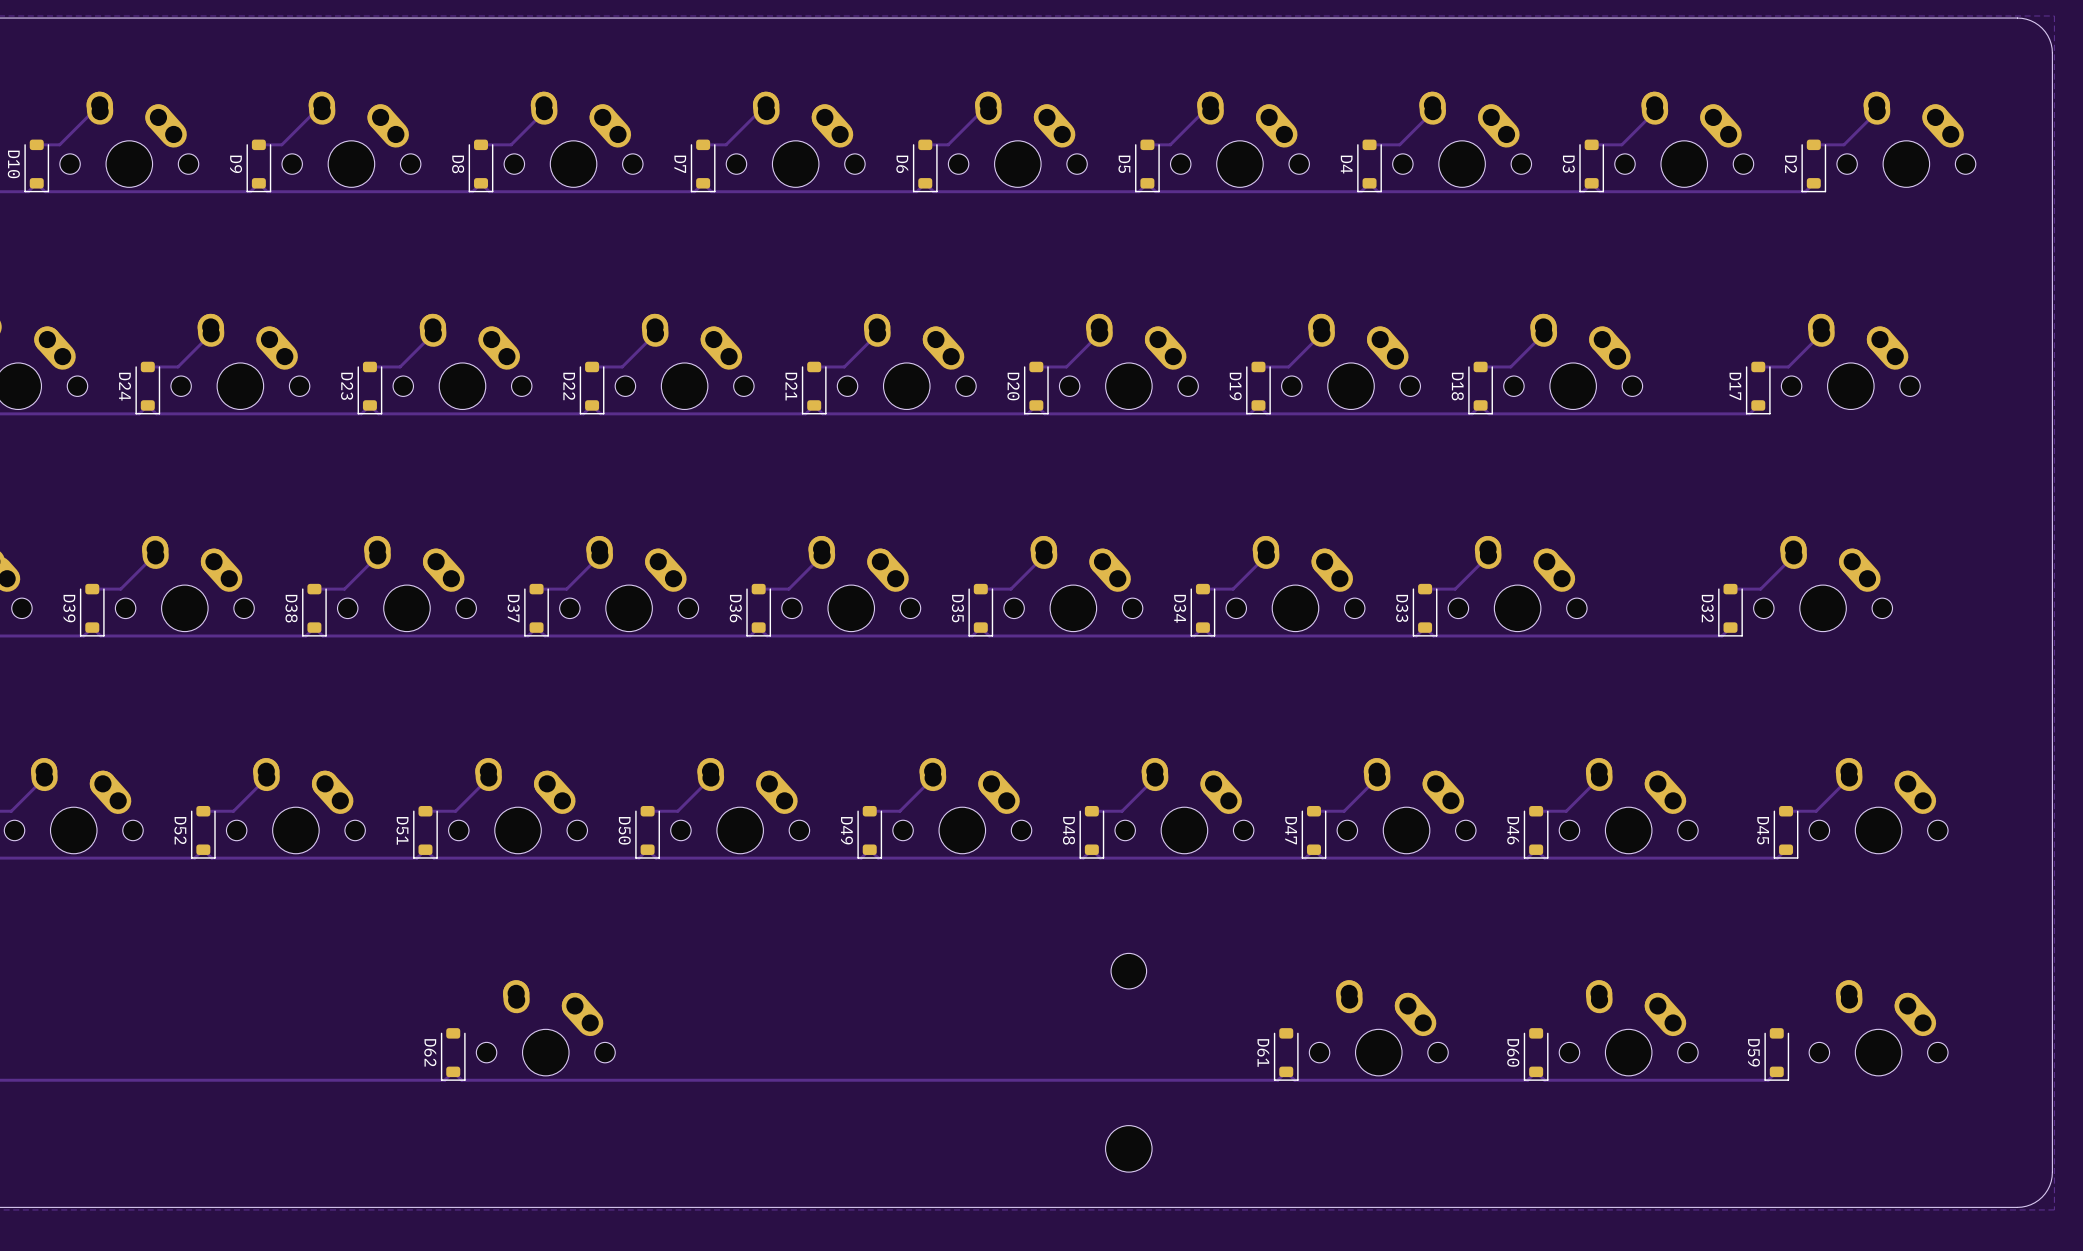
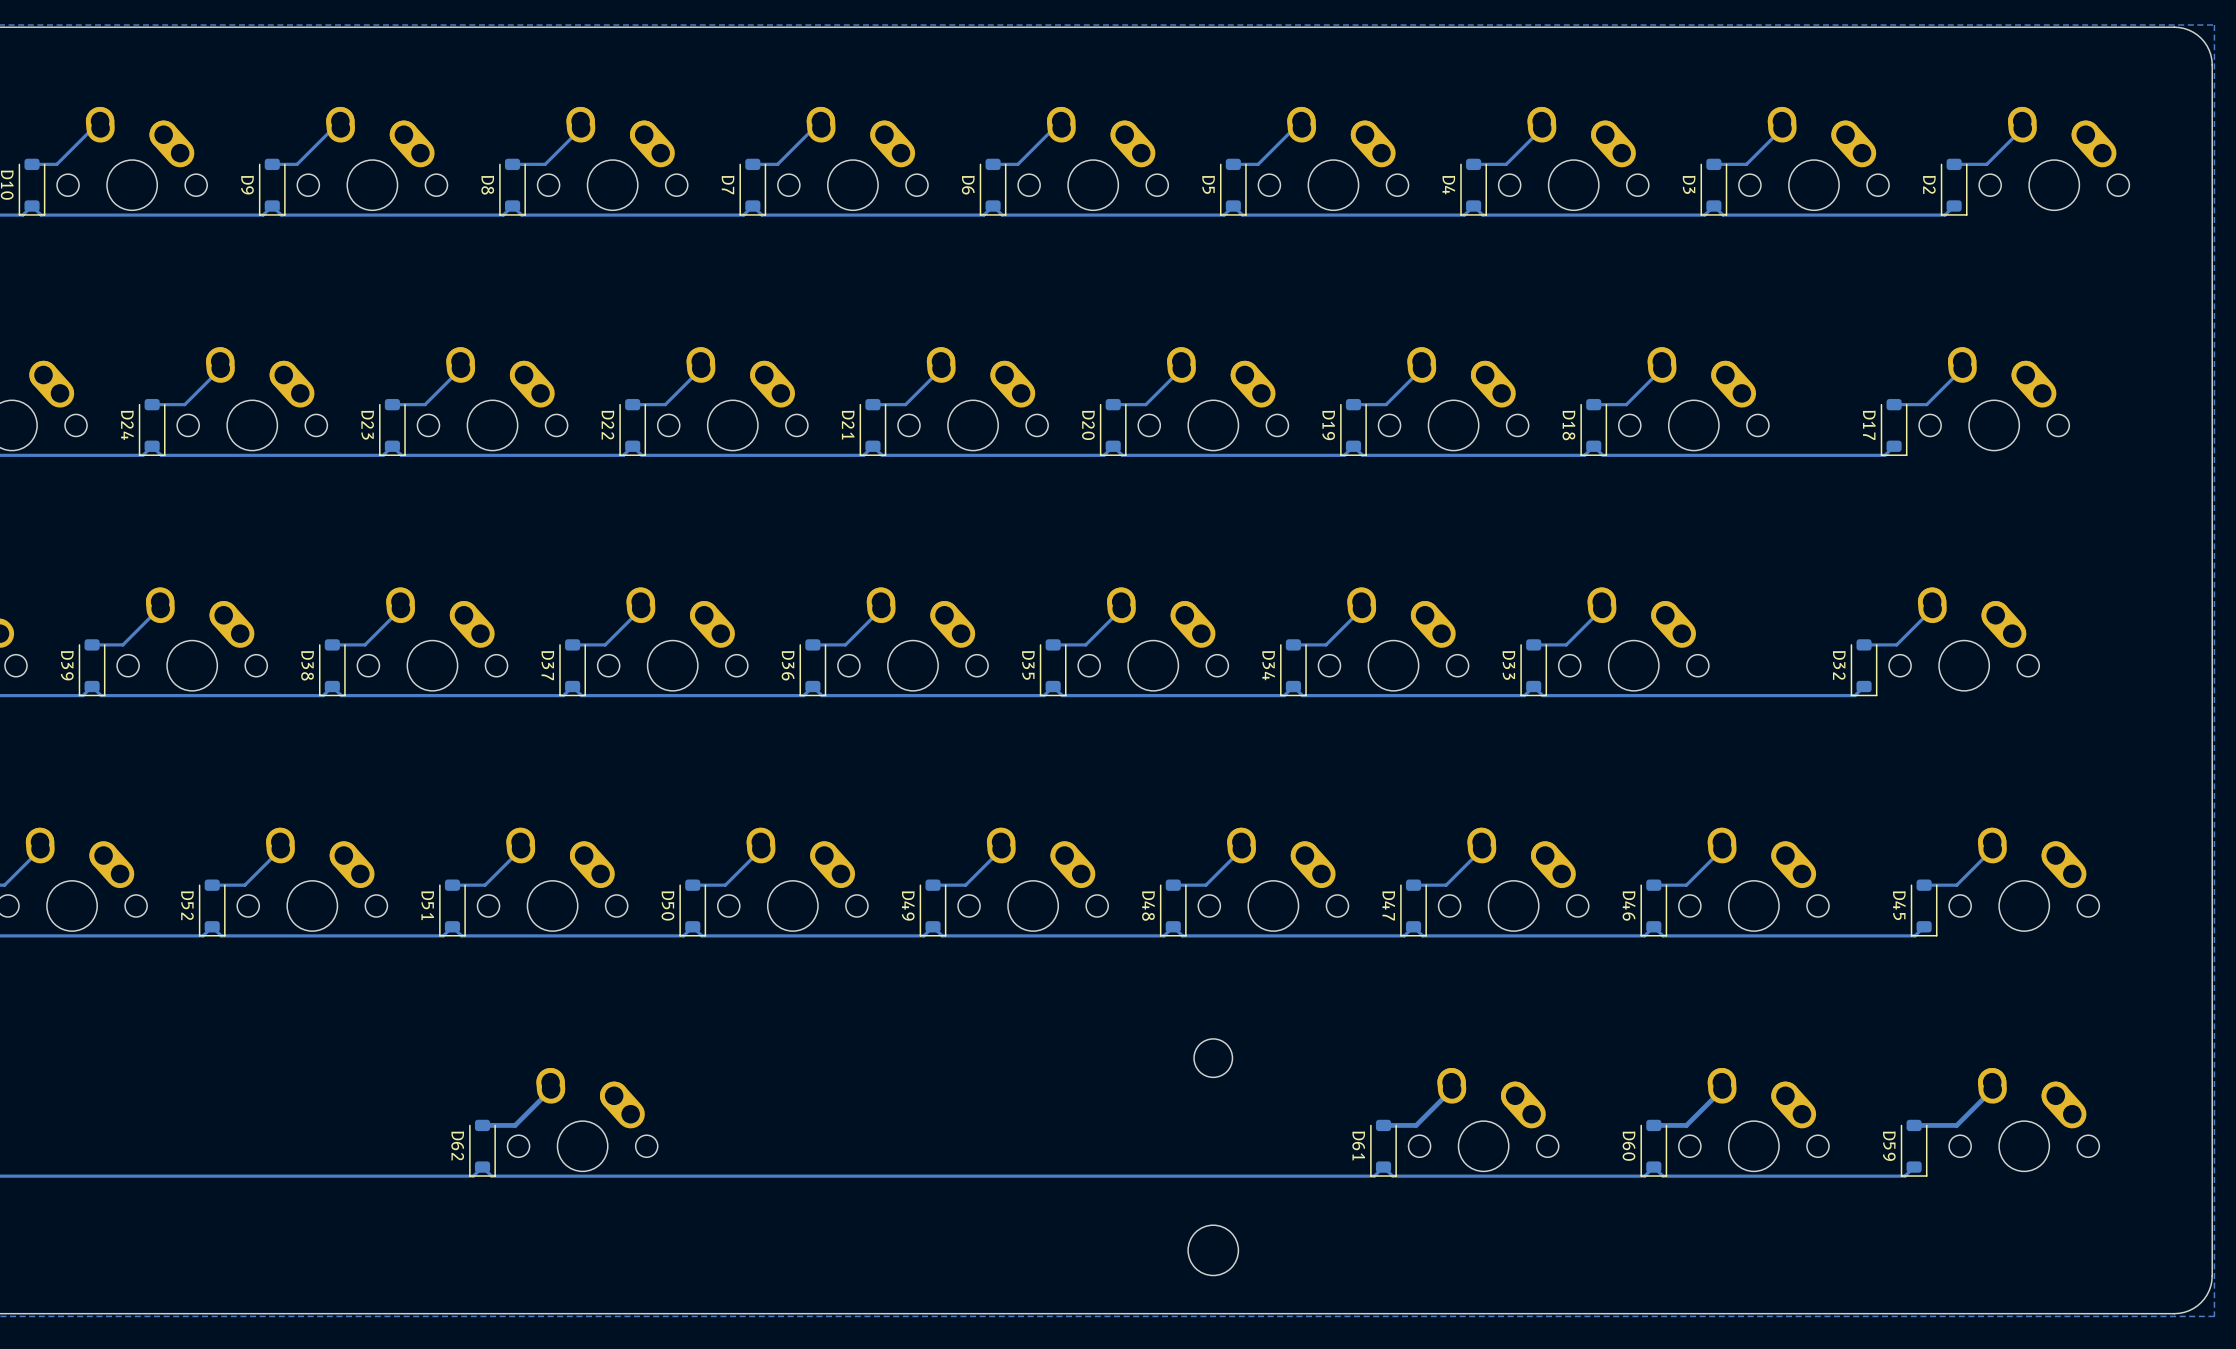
track: none -> (551, 1089) (515, 1125) (482, 1125)
track: none -> (1452, 1089) (1416, 1125) (1383, 1125)
track: none -> (1722, 1089) (1686, 1125) (1653, 1125)
track: none -> (1992, 1089) (1956, 1125) (1914, 1125)

